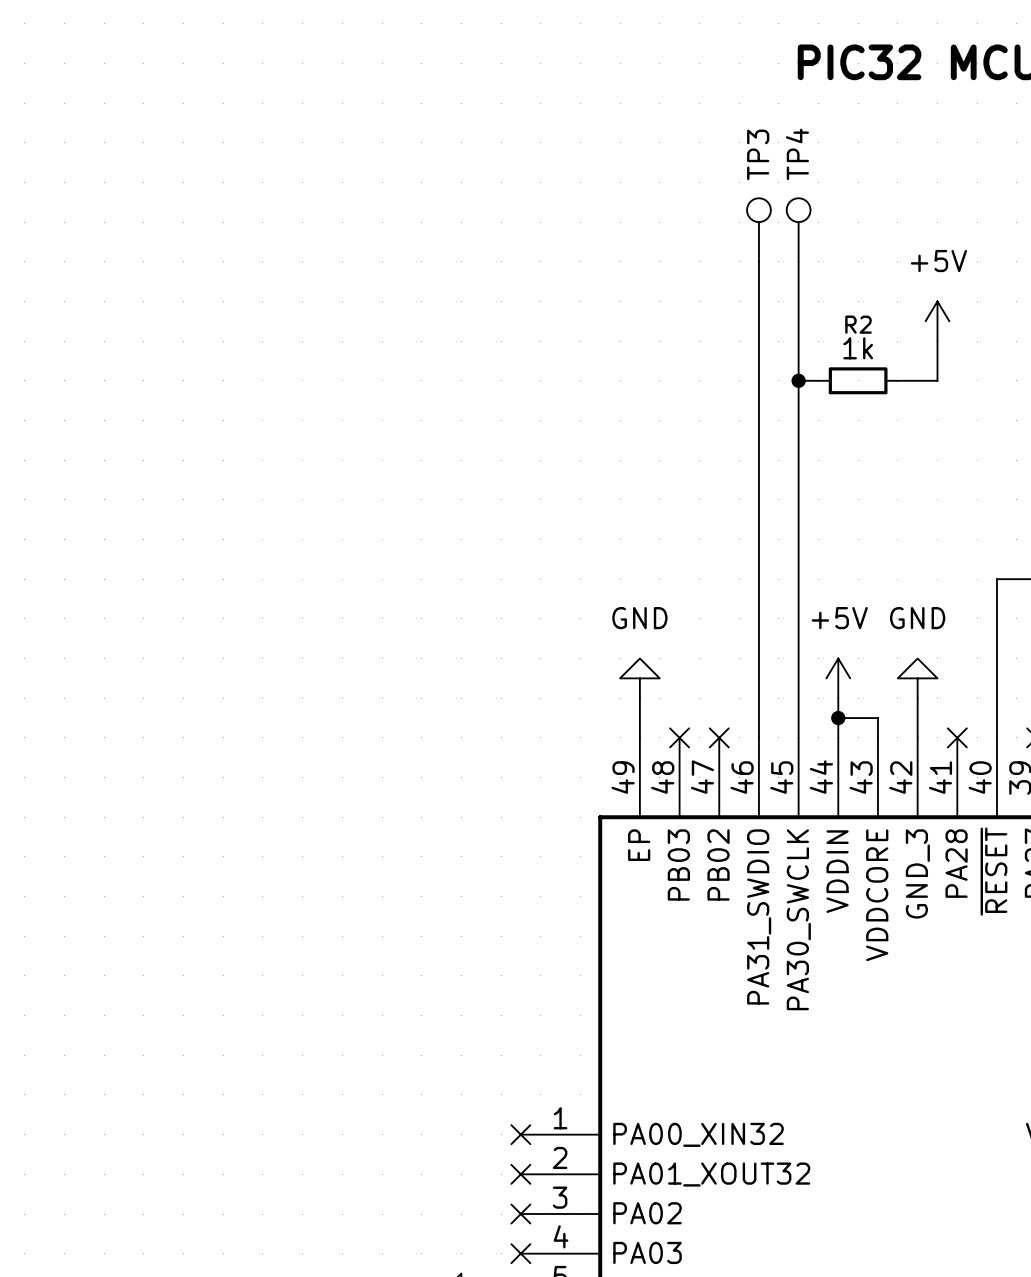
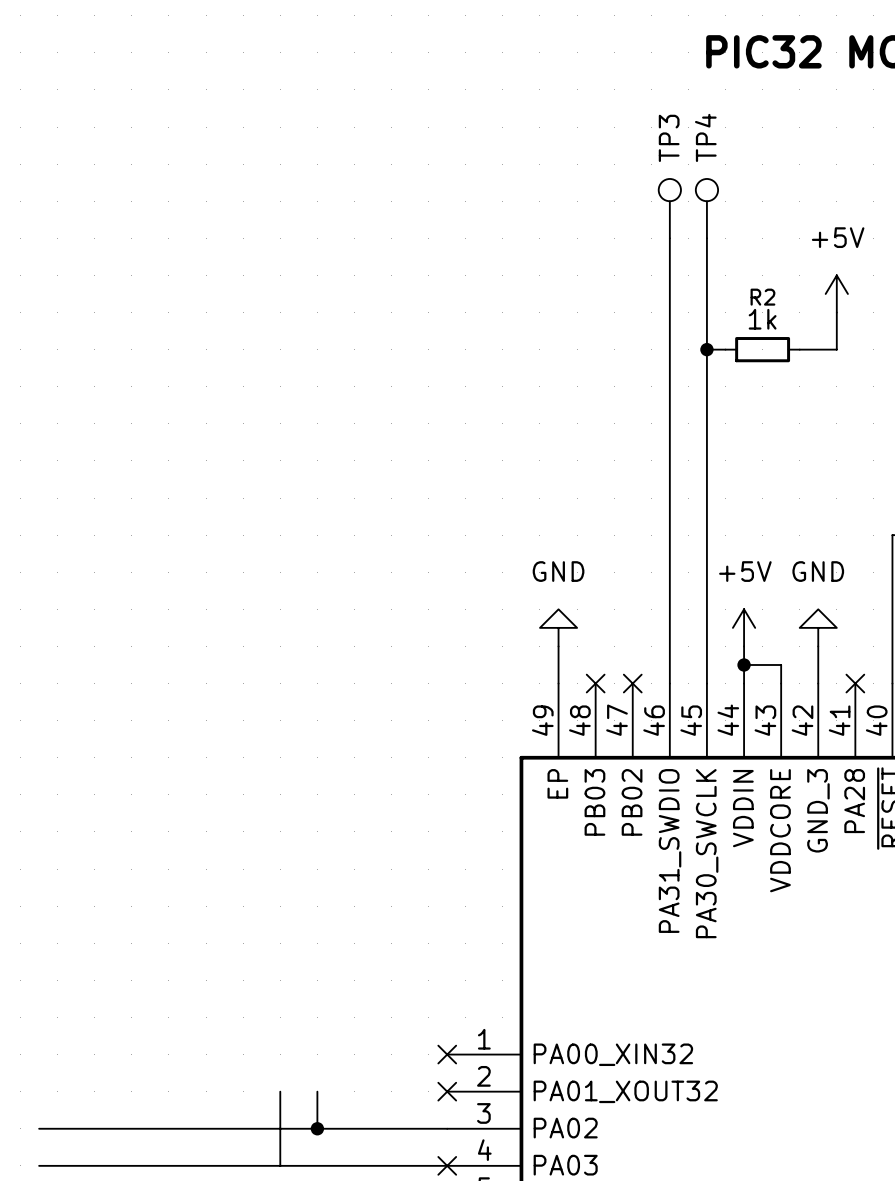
wire: none -> (280, 1091) (280, 1165)
wire: none -> (317, 1091) (317, 1128)
wire: none -> (39, 1128) (447, 1128)
junction: none -> (317, 1128)
no-connect mark: (520, 1214) -> none
wire: none -> (39, 1165) (447, 1165)

